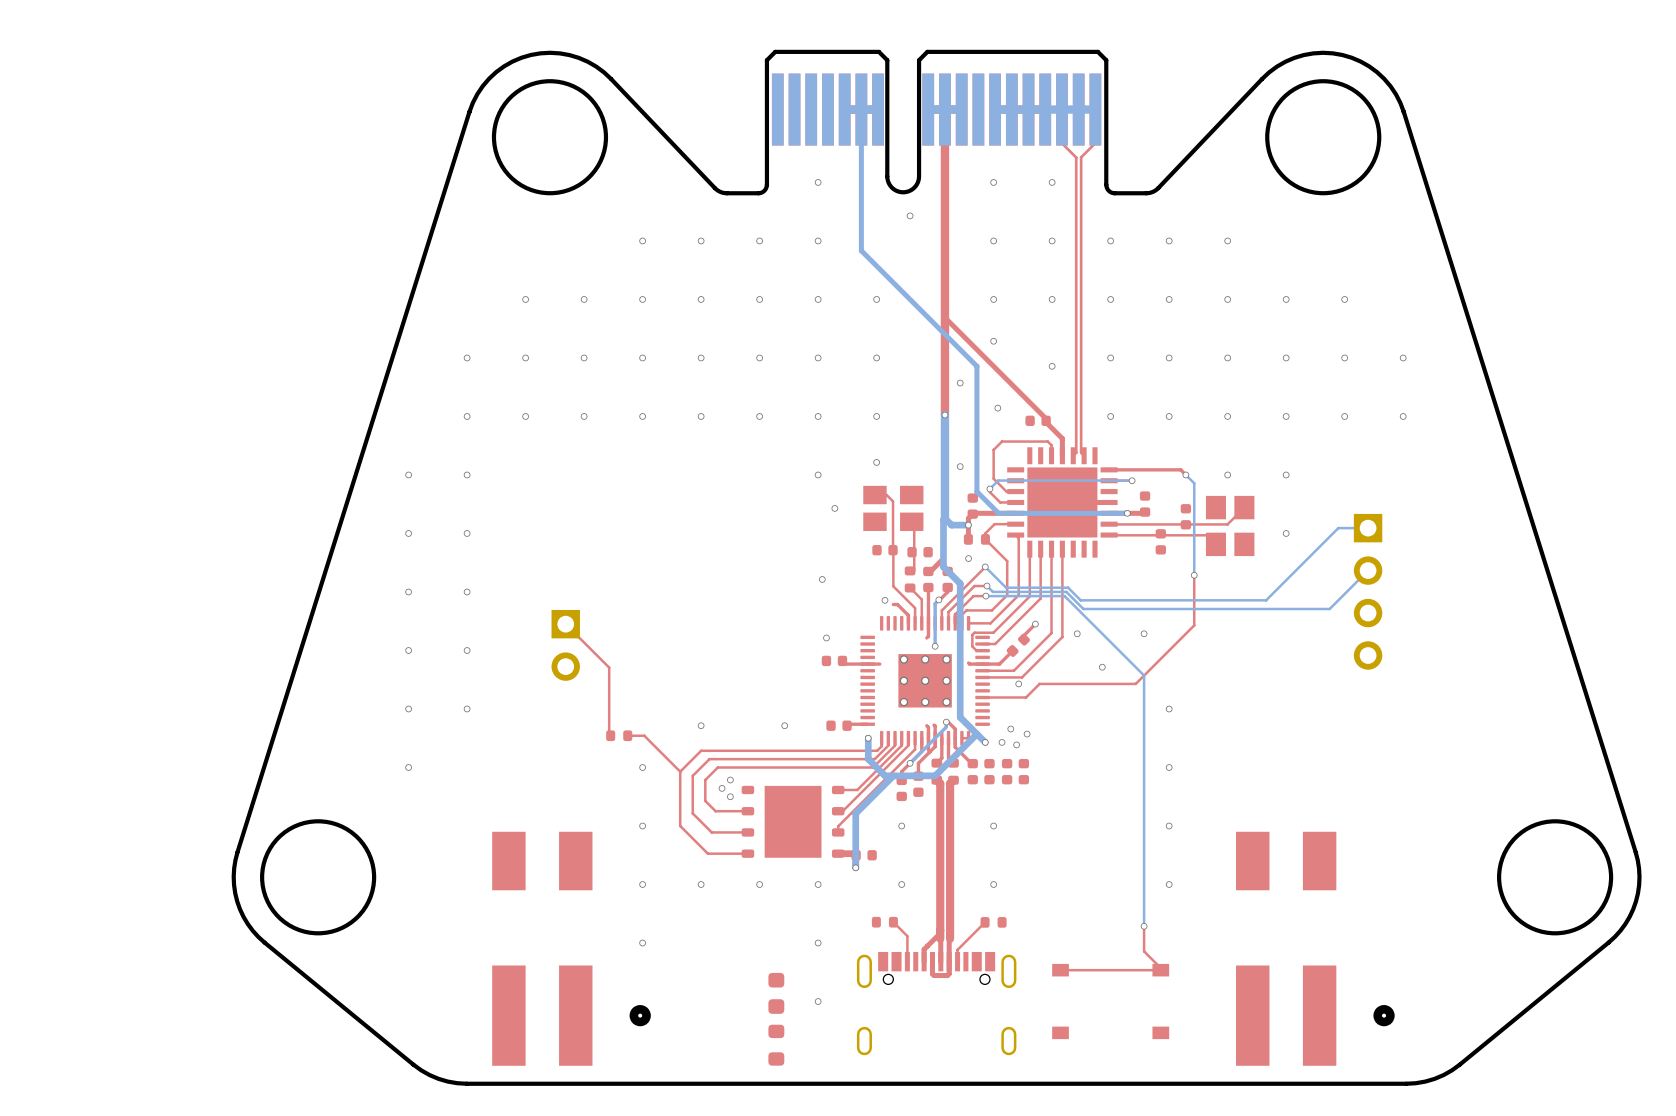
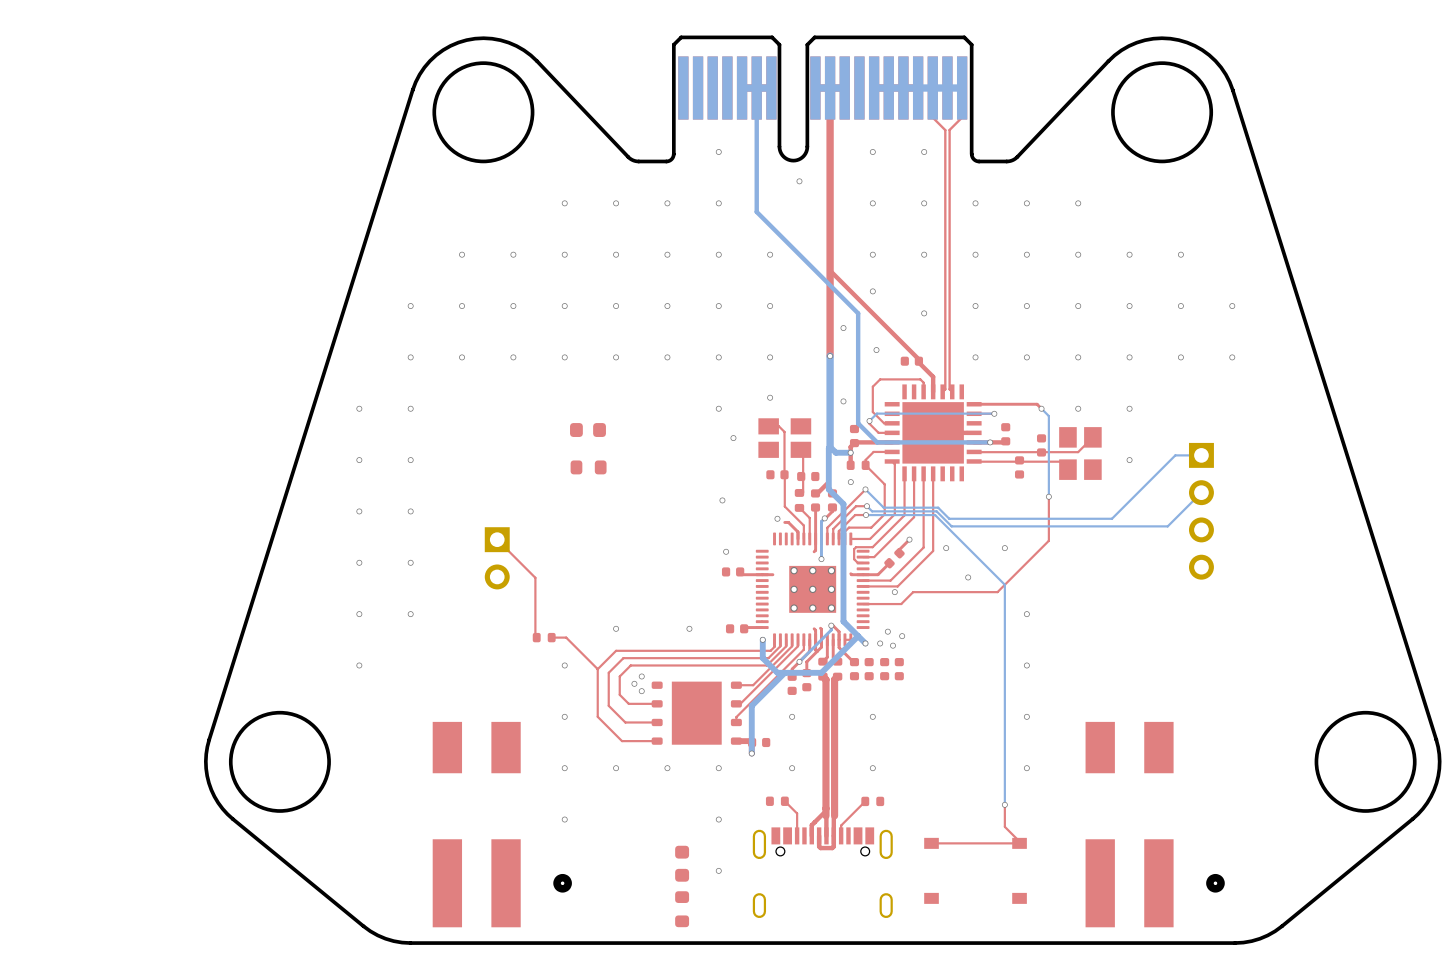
part: none -> (587, 430)
part: none -> (588, 467)

